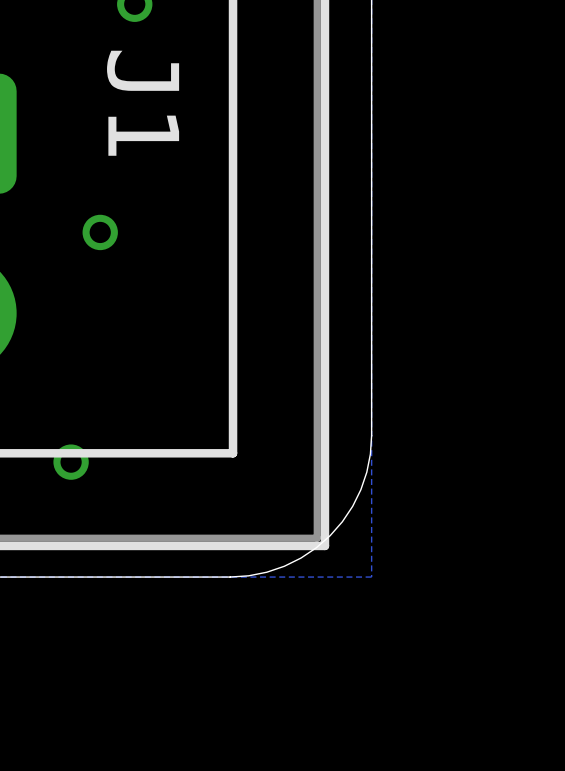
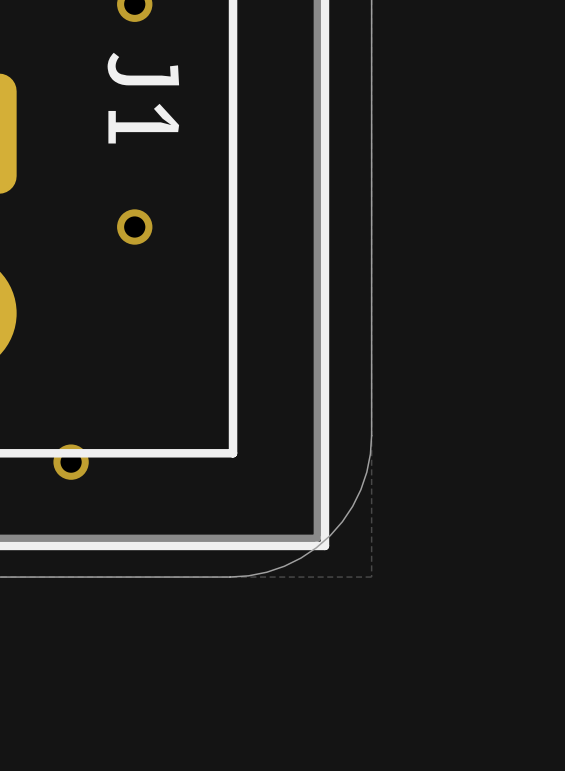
via position: (100, 232) -> (134, 227)

